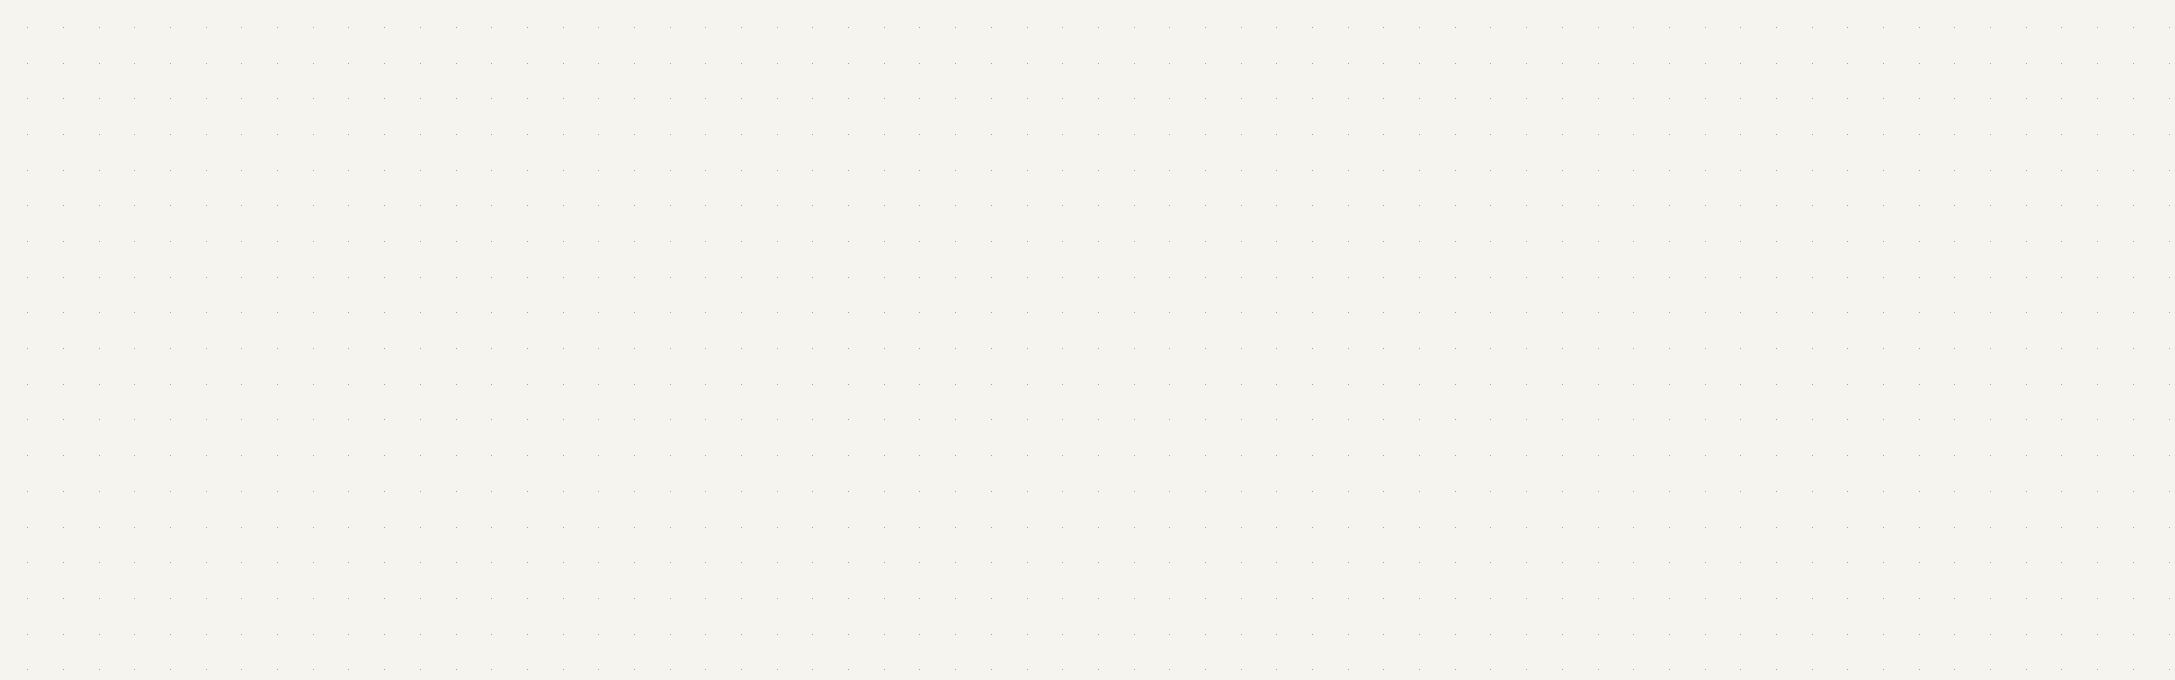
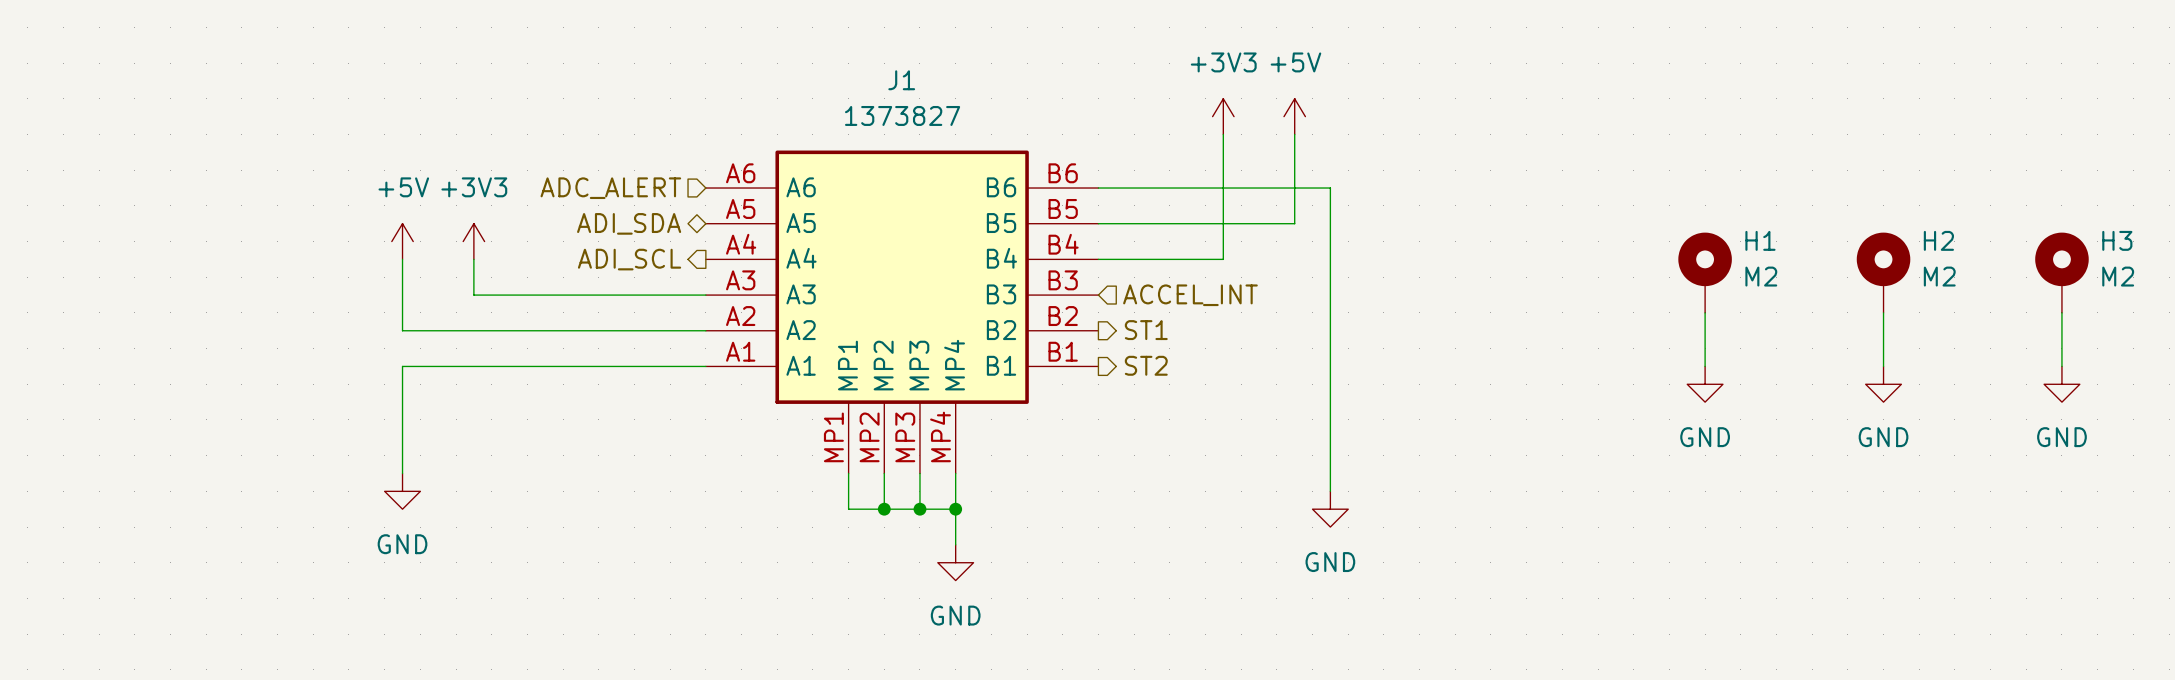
power symbol: none -> +3V3 (1223, 116)
power symbol: none -> +5V (1294, 116)
wire: none -> (1223, 134) (1223, 259) (1098, 259)
wire: none -> (1294, 134) (1294, 223) (1098, 223)
hierarchical label: none -> ADC_ALERT (610, 188)
wire: none -> (1098, 188) (1330, 188) (1330, 491)
hierarchical label: none -> ADI_SDA (629, 223)
power symbol: none -> +5V (402, 241)
power symbol: none -> +3V3 (473, 241)
wire: none -> (402, 259) (402, 330) (705, 330)
wire: none -> (473, 259) (473, 295) (705, 295)
hierarchical label: none -> ADI_SCL (629, 259)
H1: none -> M2 (1705, 272)
H2: none -> M2 (1883, 272)
H3: none -> M2 (2061, 272)
hierarchical label: none -> ACCEL_INT (1190, 295)
J1: none -> 1373827 (902, 312)
wire: none -> (1705, 312) (1705, 366)
wire: none -> (1883, 312) (1883, 366)
wire: none -> (2061, 312) (2061, 366)
hierarchical label: none -> ST1 (1146, 330)
hierarchical label: none -> ST2 (1146, 365)
wire: none -> (705, 366) (402, 366) (402, 473)
power symbol: none -> GND (1705, 384)
power symbol: none -> GND (1883, 384)
power symbol: none -> GND (2061, 384)
wire: none -> (848, 473) (848, 509) (955, 509)
wire: none -> (884, 473) (884, 509)
wire: none -> (919, 473) (919, 509)
wire: none -> (955, 473) (955, 544)
power symbol: none -> GND (402, 491)
junction: none -> (884, 509)
junction: none -> (919, 509)
junction: none -> (955, 509)
power symbol: none -> GND (1330, 509)
power symbol: none -> GND (955, 562)

